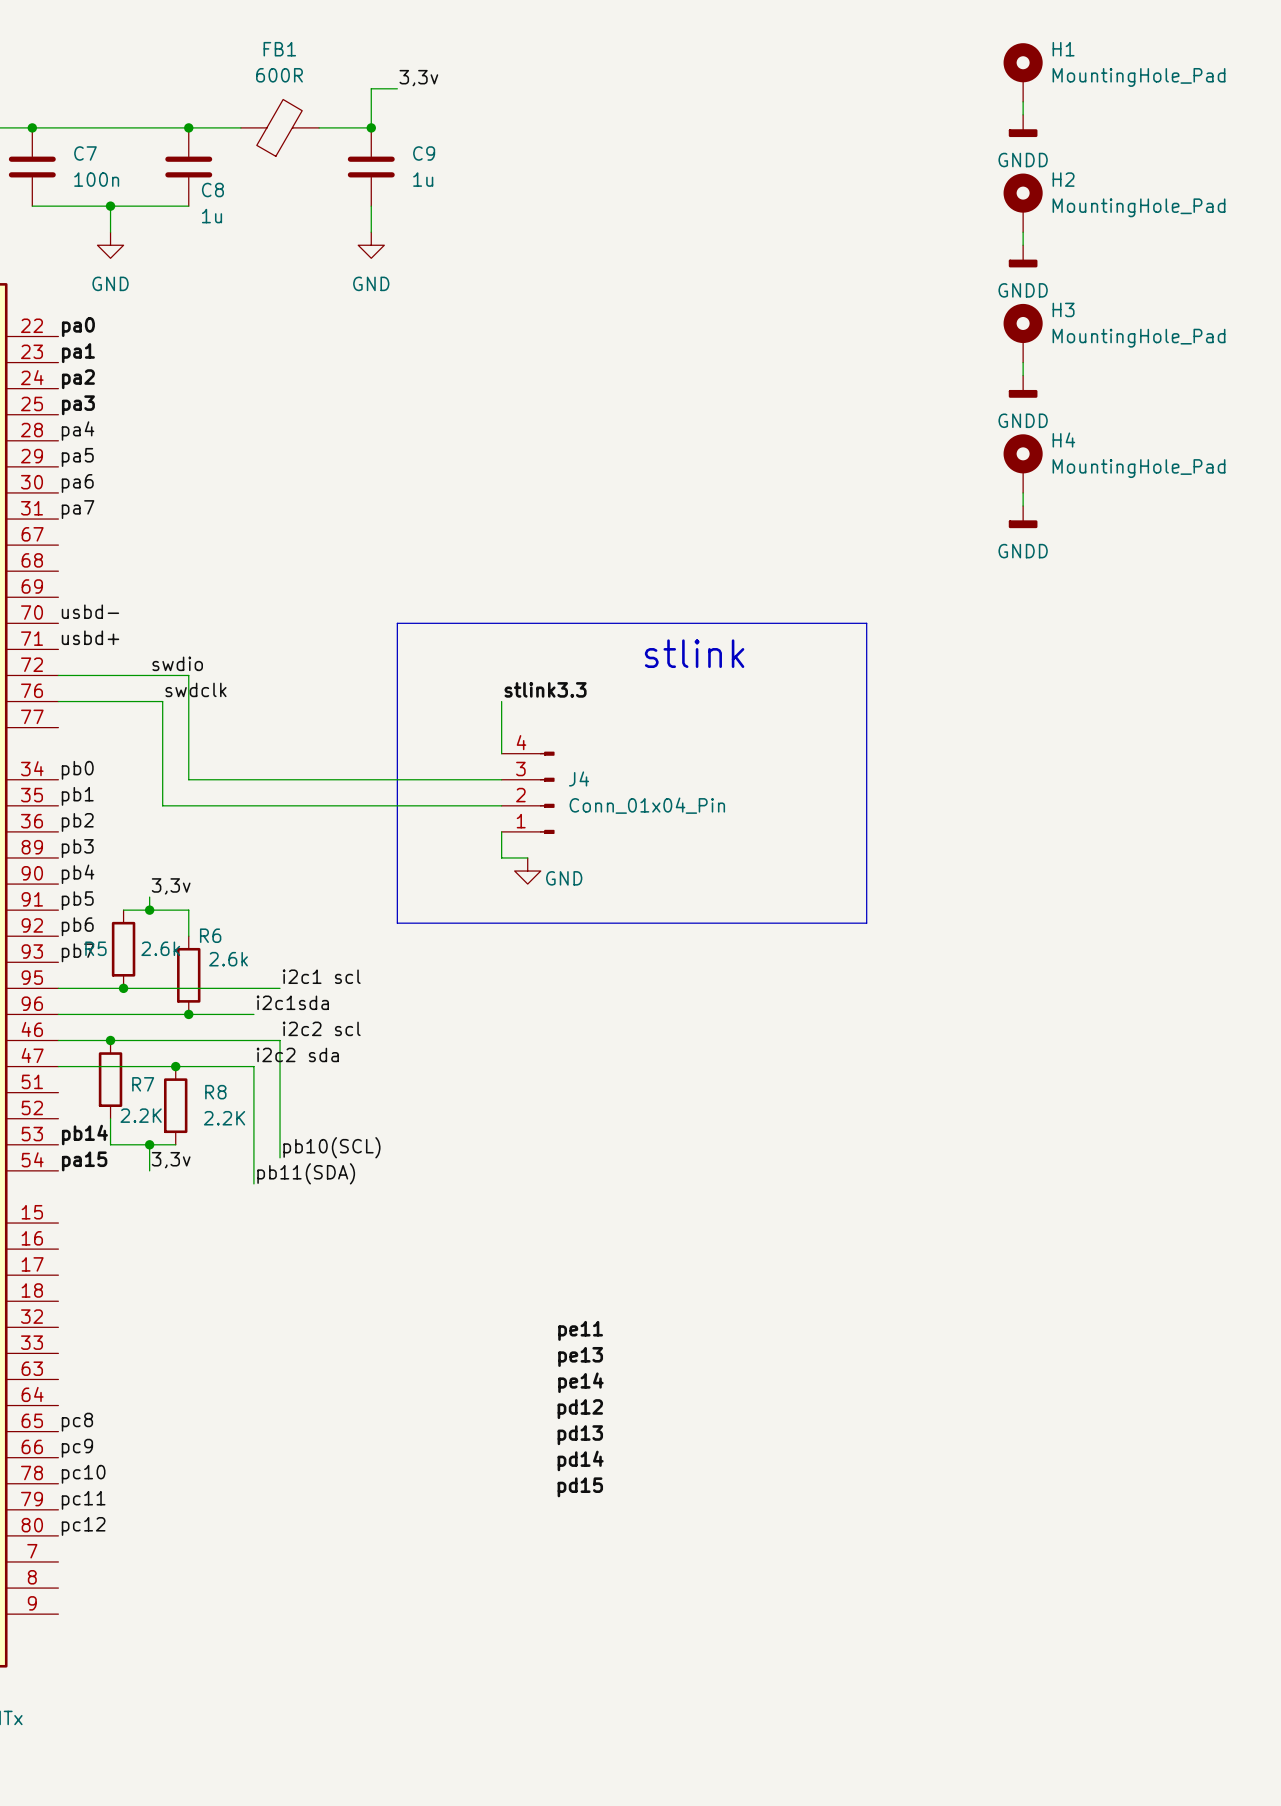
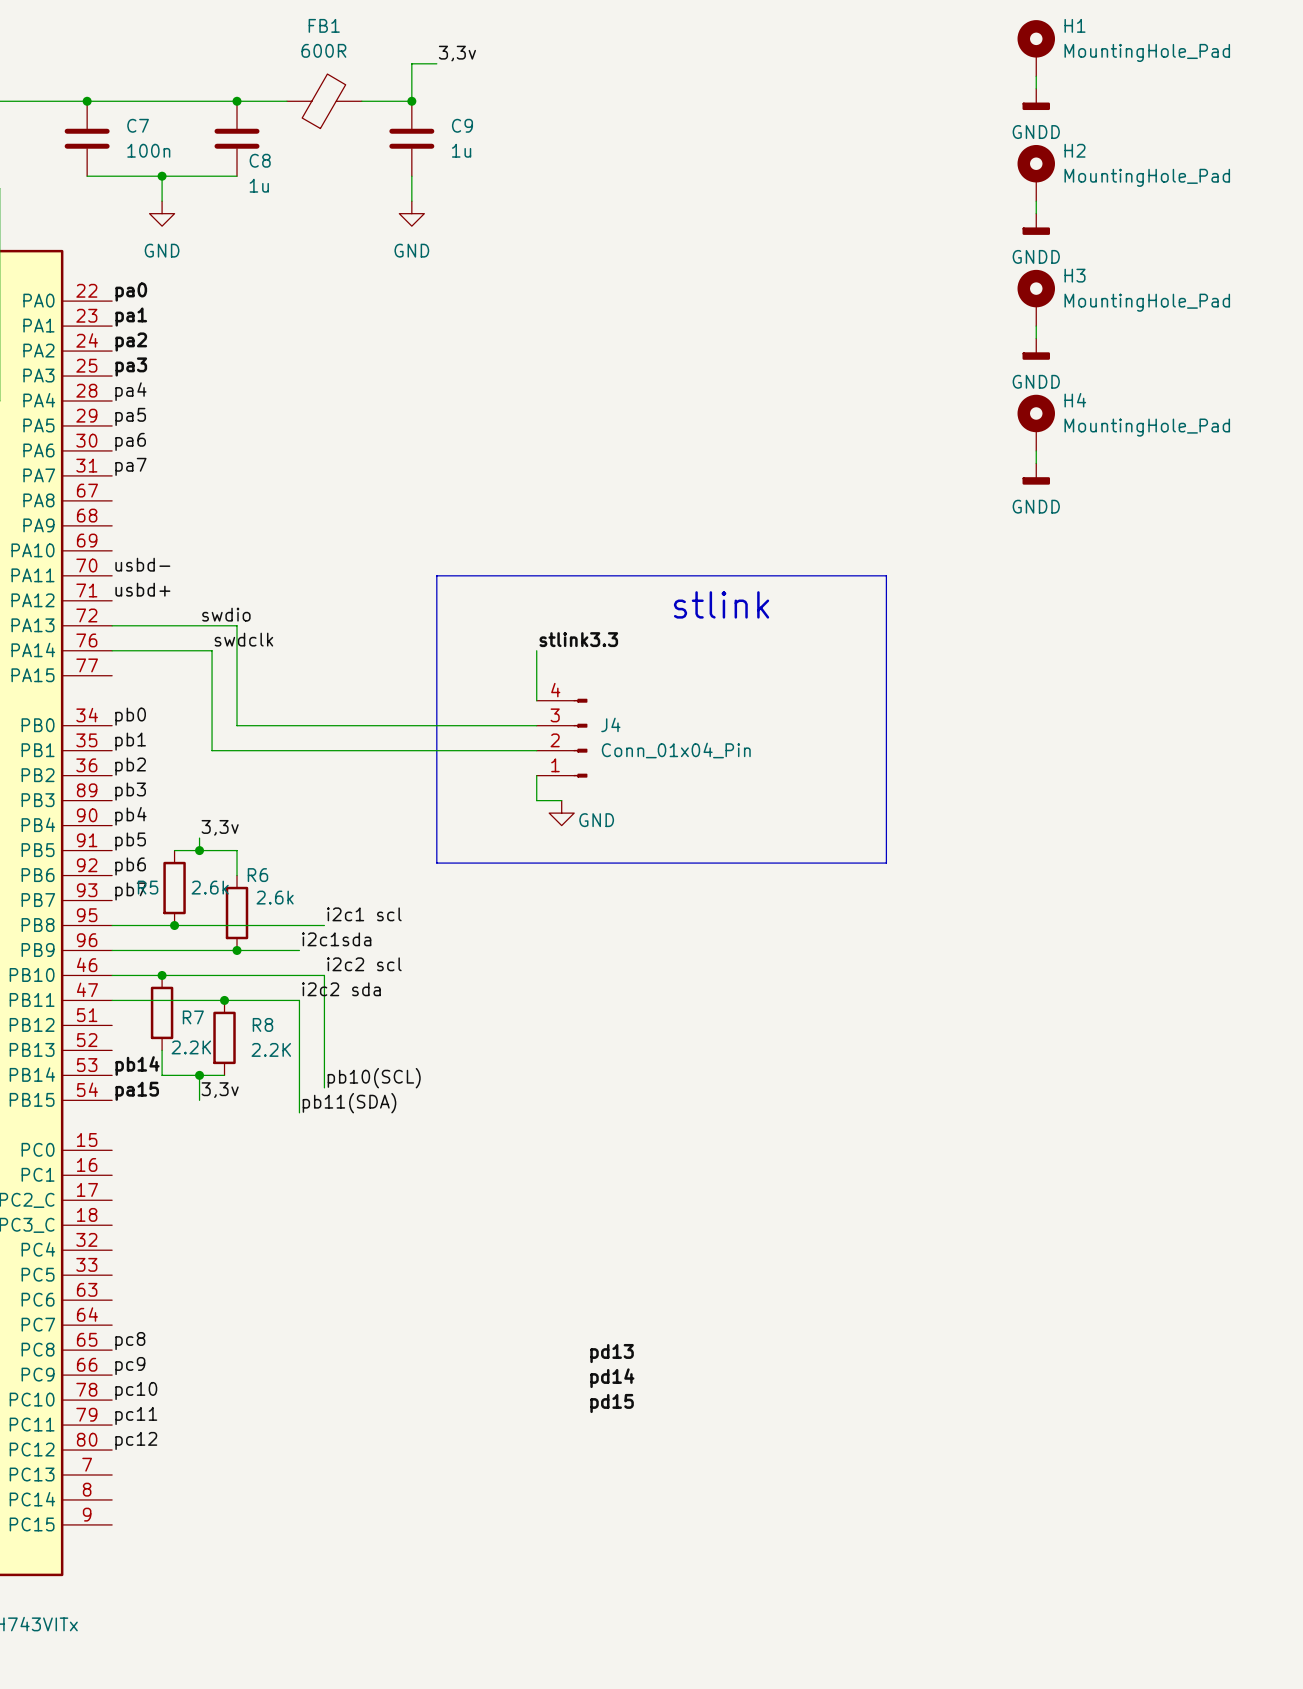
label: pe11 (580, 1330) -> none
label: pe13 (580, 1356) -> none
label: pe14 (580, 1382) -> none
label: pd12 (580, 1409) -> none

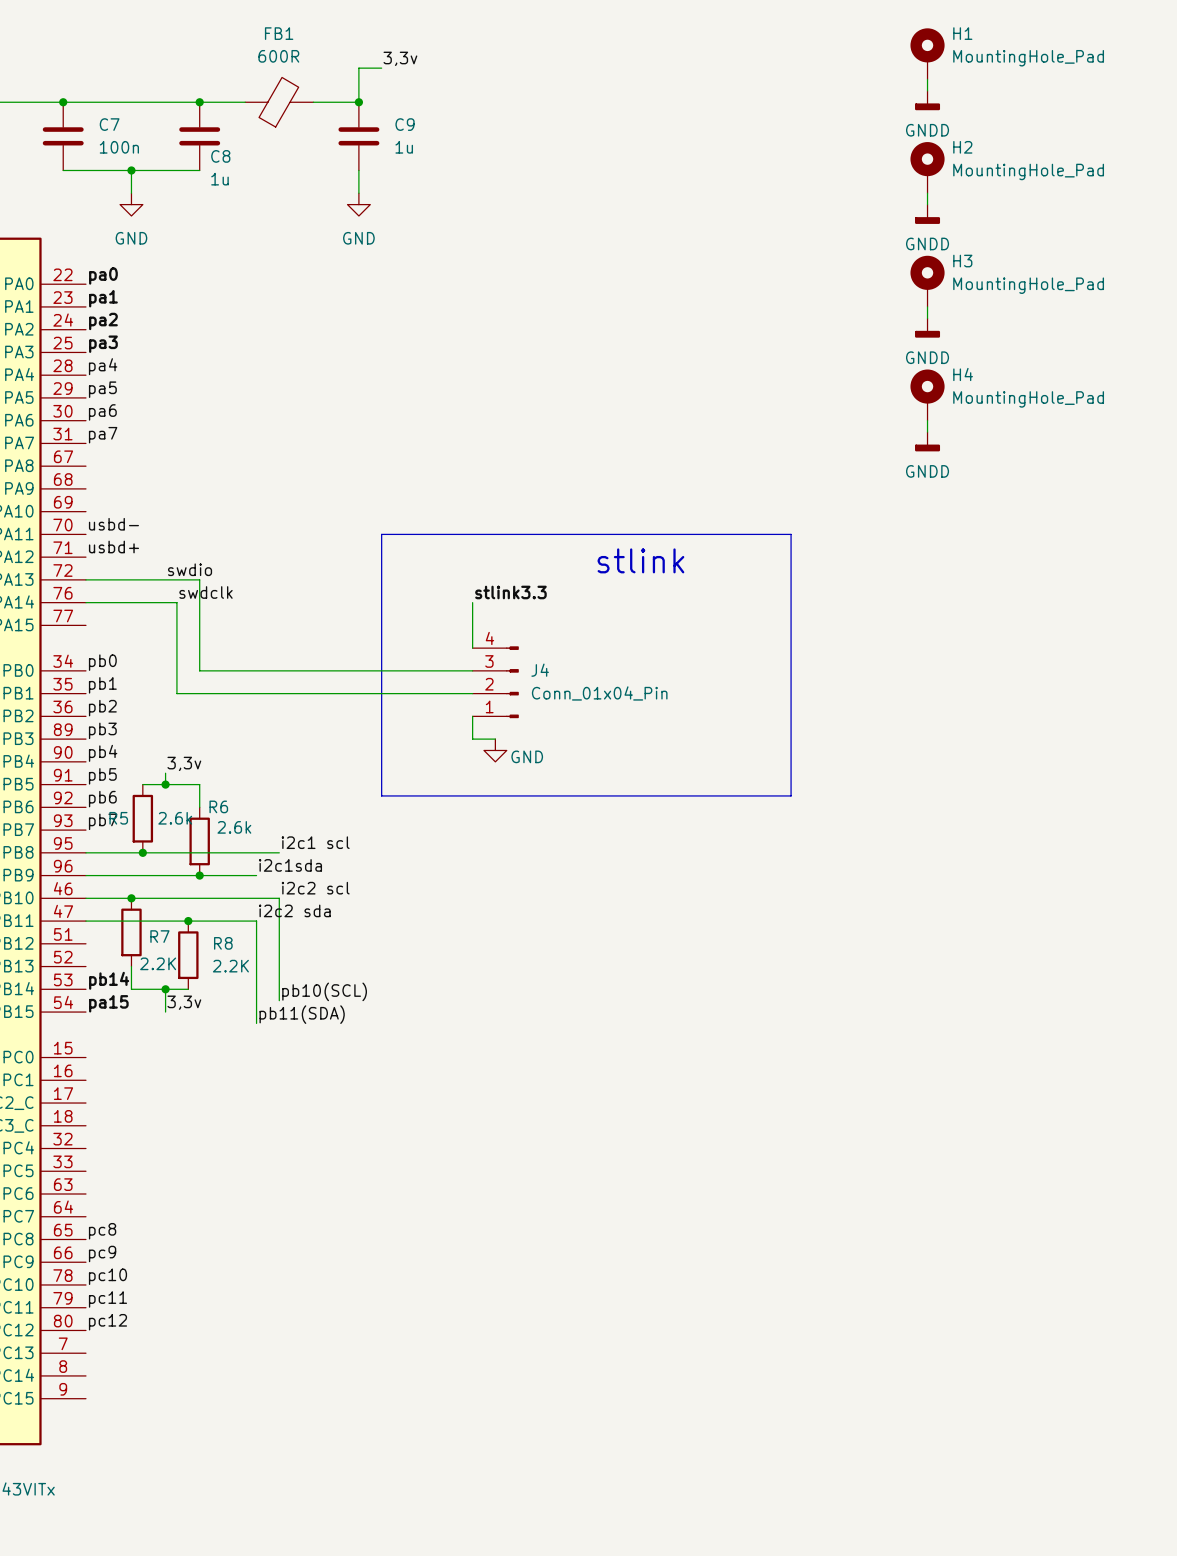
label: pd13 (612, 1353) -> none
label: pd14 (612, 1378) -> none
label: pd15 (612, 1403) -> none

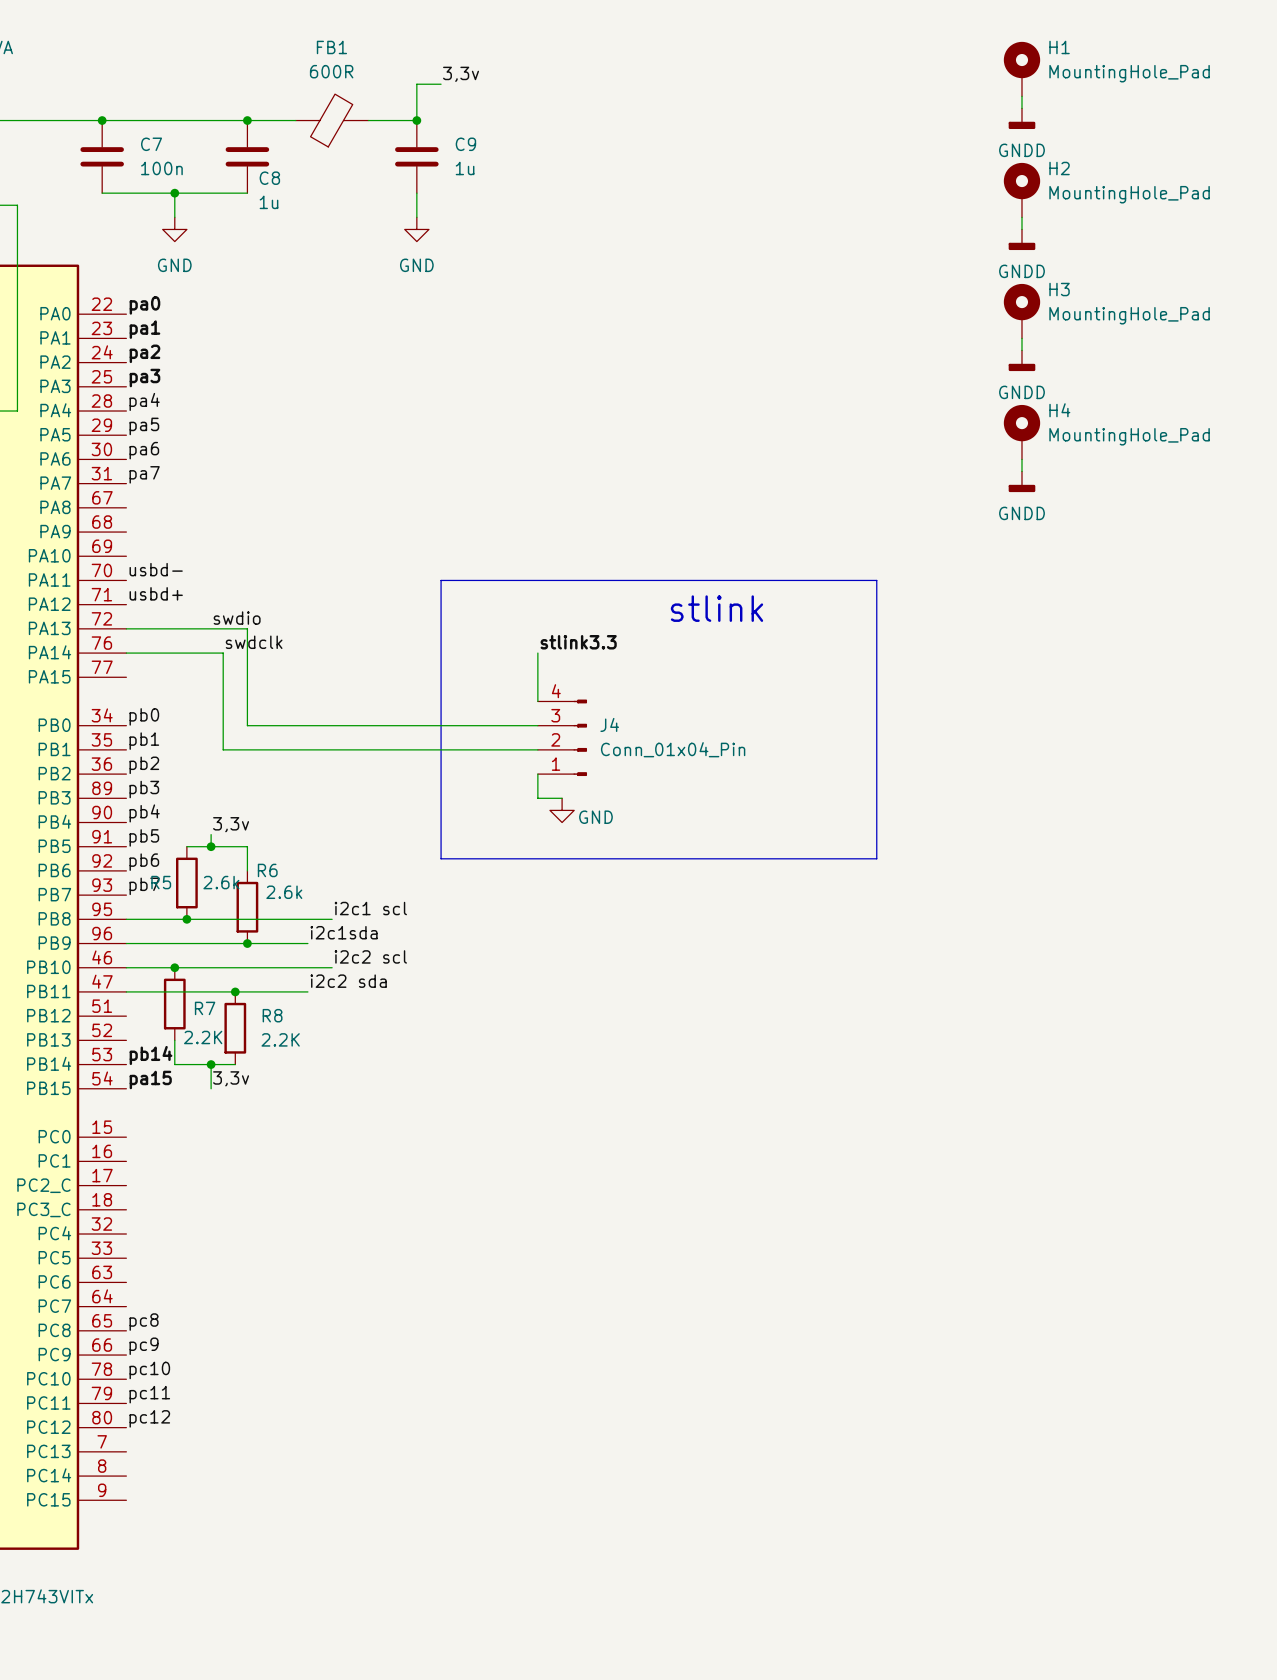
wire: (279, 898) (279, 1000) -> none
wire: (256, 921) (256, 1023) -> none
label: pb10(SCL) (324, 991) -> none
label: pb11(SDA) (302, 1014) -> none

